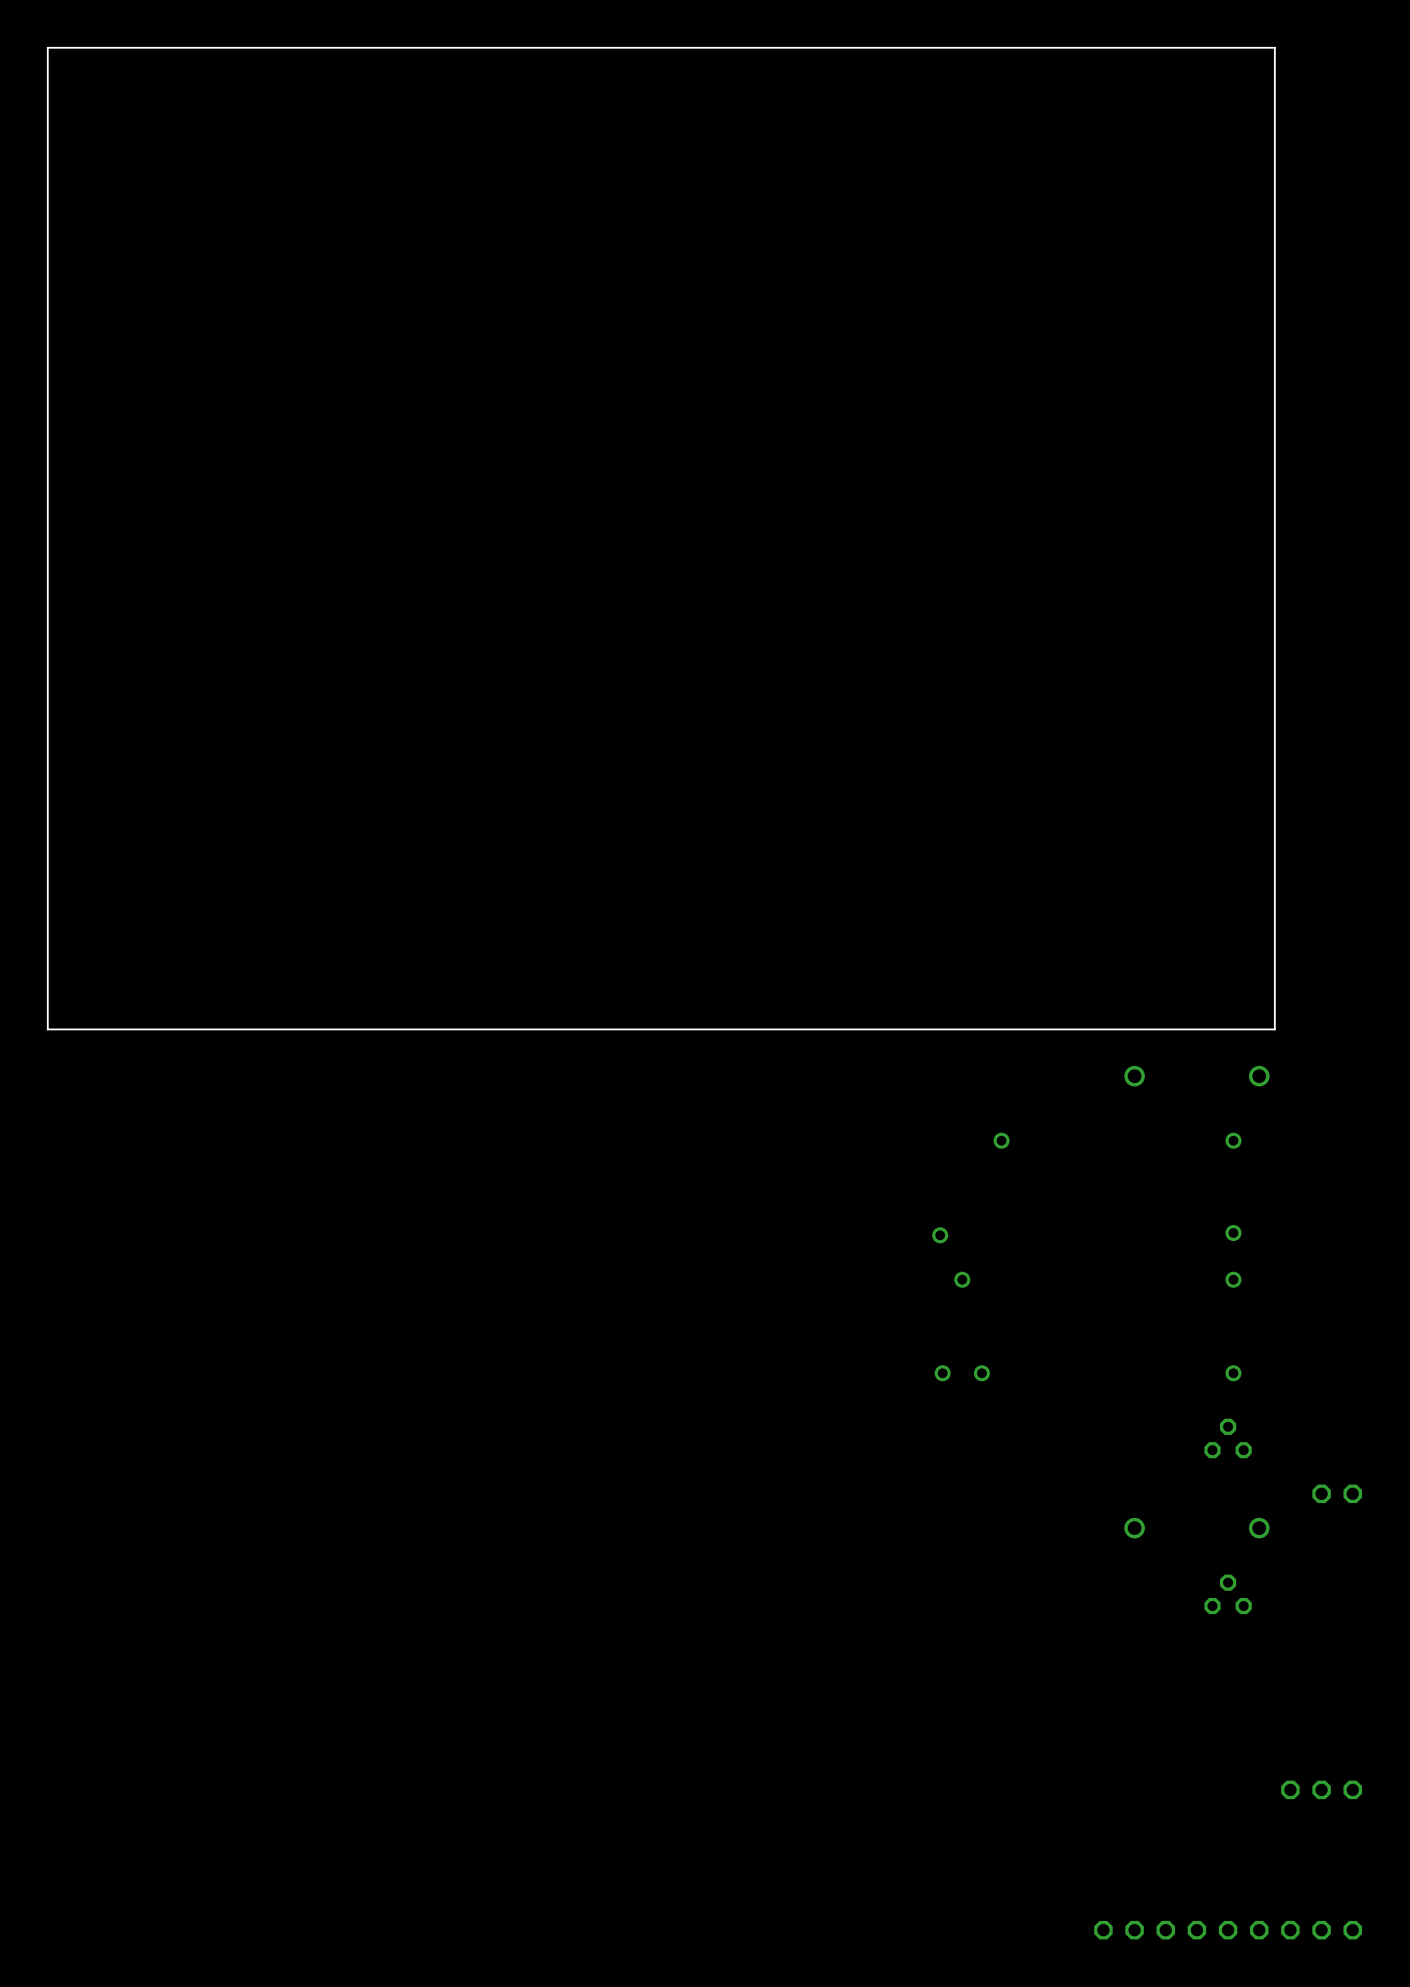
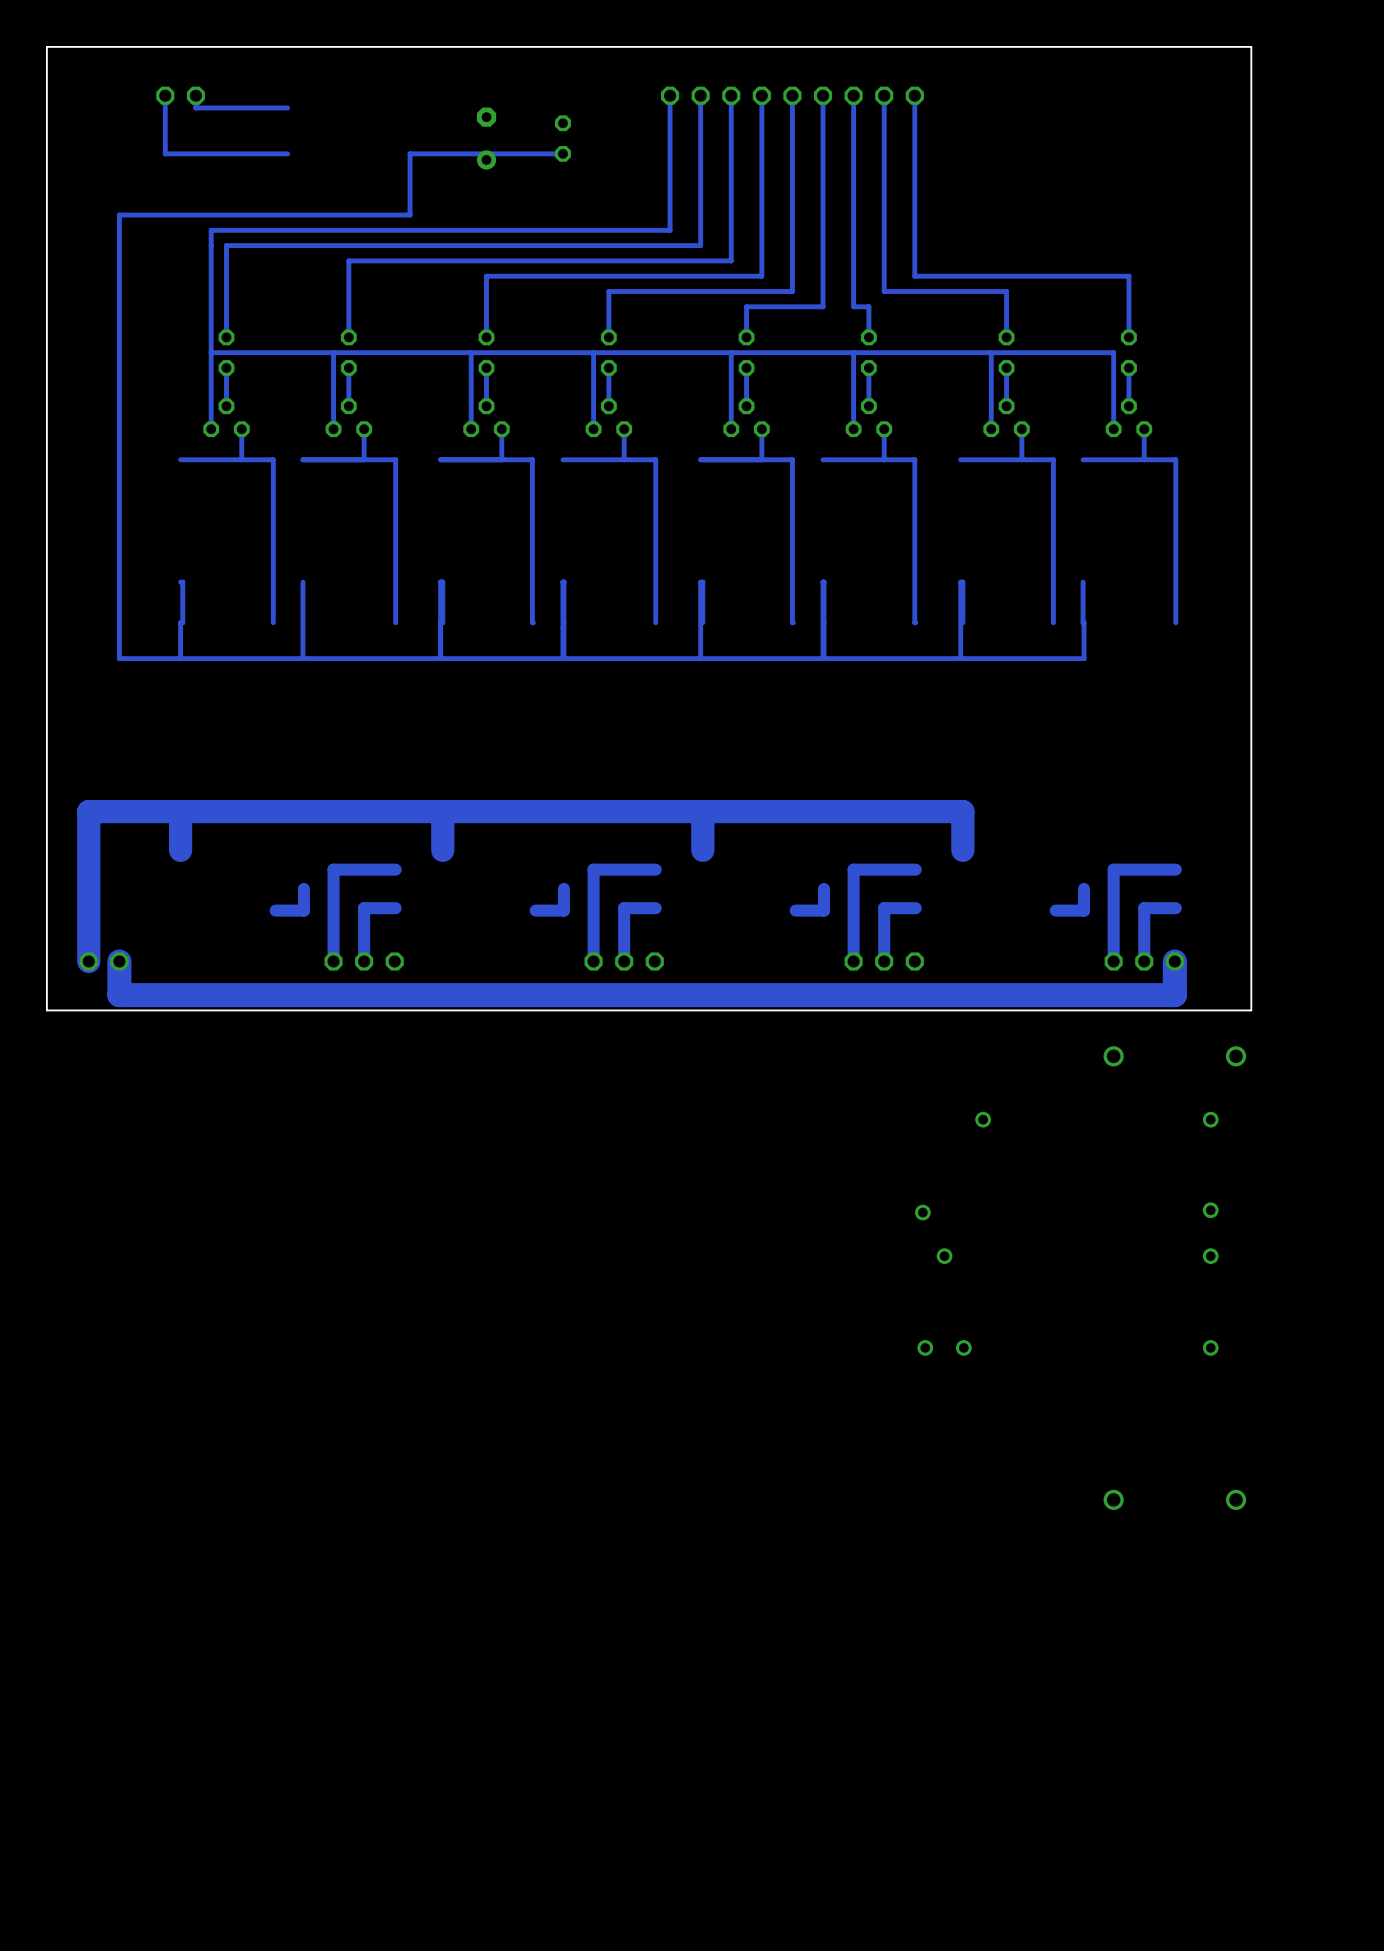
track: none -> (165, 95) (165, 153) (287, 153)
part: none -> (180, 95)
track: none -> (195, 95) (195, 107) (287, 107)
track: none -> (670, 95) (670, 230) (211, 230) (211, 429)
track: none -> (700, 95) (700, 245) (226, 245) (226, 337)
track: none -> (731, 95) (731, 260) (348, 260) (348, 337)
track: none -> (761, 95) (761, 276) (486, 276) (486, 337)
track: none -> (792, 95) (792, 291) (608, 291) (608, 337)
part: none -> (792, 95)
track: none -> (823, 95) (823, 306) (746, 306) (746, 337)
track: none -> (853, 95) (853, 306) (868, 306) (868, 337)
track: none -> (884, 95) (884, 291) (1006, 291) (1006, 337)
track: none -> (914, 95) (914, 276) (1128, 276) (1128, 337)
part: none -> (486, 138)
part: none -> (562, 138)
track: none -> (562, 153) (410, 153) (410, 215) (119, 215) (119, 658) (1084, 658) (1083, 582)
track: none -> (211, 352) (1113, 352) (1113, 429)
part: none -> (226, 352)
track: none -> (333, 352) (333, 429)
part: none -> (348, 352)
track: none -> (471, 352) (471, 429)
part: none -> (486, 352)
track: none -> (593, 352) (593, 429)
part: none -> (608, 352)
track: none -> (731, 352) (731, 429)
part: none -> (746, 352)
track: none -> (853, 352) (853, 429)
part: none -> (868, 352)
track: none -> (991, 352) (991, 429)
part: none -> (1006, 352)
part: none -> (1128, 352)
track: none -> (226, 367) (226, 406)
track: none -> (348, 367) (348, 406)
track: none -> (486, 367) (486, 406)
track: none -> (608, 367) (608, 406)
track: none -> (746, 367) (746, 406)
track: none -> (868, 367) (868, 406)
track: none -> (1006, 367) (1006, 406)
track: none -> (1128, 367) (1128, 406)
part: none -> (226, 417)
part: none -> (348, 417)
part: none -> (486, 417)
part: none -> (608, 417)
part: none -> (746, 417)
part: none -> (868, 417)
part: none -> (1006, 417)
part: none -> (1128, 417)
track: none -> (241, 429) (241, 459)
track: none -> (364, 429) (364, 459)
track: none -> (501, 429) (501, 459)
track: none -> (624, 429) (624, 459)
track: none -> (761, 429) (761, 459)
track: none -> (884, 429) (884, 459)
track: none -> (1021, 429) (1021, 459)
track: none -> (1144, 429) (1144, 459)
track: none -> (180, 459) (273, 459) (273, 622)
track: none -> (302, 459) (395, 459) (395, 622)
track: none -> (440, 459) (532, 459) (533, 622)
track: none -> (562, 459) (655, 459) (655, 622)
track: none -> (700, 459) (792, 459) (793, 622)
track: none -> (823, 459) (914, 459) (915, 622)
track: none -> (960, 459) (1053, 459) (1053, 622)
track: none -> (1083, 459) (1175, 459) (1175, 622)
track: none -> (180, 582) (182, 582) (180, 658)
track: none -> (302, 582) (302, 658)
track: none -> (440, 622) (442, 622) (442, 582) (440, 582) (440, 658)
track: none -> (702, 622) (702, 582) (700, 582) (700, 658)
track: none -> (962, 622) (962, 582) (960, 582) (960, 658)
track: none -> (563, 658) (563, 582) (562, 658)
track: none -> (823, 658) (823, 582) (823, 658)
track: none -> (442, 811) (440, 811) (440, 850) (442, 850) (442, 811)
track: none -> (702, 811) (700, 811) (700, 850) (702, 850) (702, 811)
track: none -> (180, 850) (180, 811) (180, 850)
track: none -> (962, 850) (962, 811) (88, 811) (88, 961)
track: none -> (395, 869) (333, 869) (333, 961)
track: none -> (655, 869) (593, 869) (593, 961)
track: none -> (915, 869) (853, 869) (853, 961)
track: none -> (1175, 869) (1113, 869) (1113, 961)
track: none -> (303, 888) (303, 910) (275, 910)
track: none -> (563, 888) (563, 910) (535, 910)
track: none -> (823, 888) (823, 910) (795, 910)
track: none -> (1084, 888) (1084, 910) (1055, 910)
track: none -> (395, 908) (364, 908) (364, 961)
track: none -> (655, 908) (624, 908) (624, 961)
track: none -> (915, 908) (884, 908) (884, 961)
track: none -> (1175, 908) (1144, 908) (1144, 961)
part: none -> (104, 961)
part: none -> (364, 961)
part: none -> (624, 961)
part: none -> (884, 961)
part: none -> (1144, 961)
track: none -> (1174, 961) (1174, 995) (119, 995) (119, 961)
part: (1228, 1438) -> none
part: (1337, 1493) -> none
part: (1228, 1594) -> none
part: (1321, 1789) -> none
part: (1228, 1930) -> none

